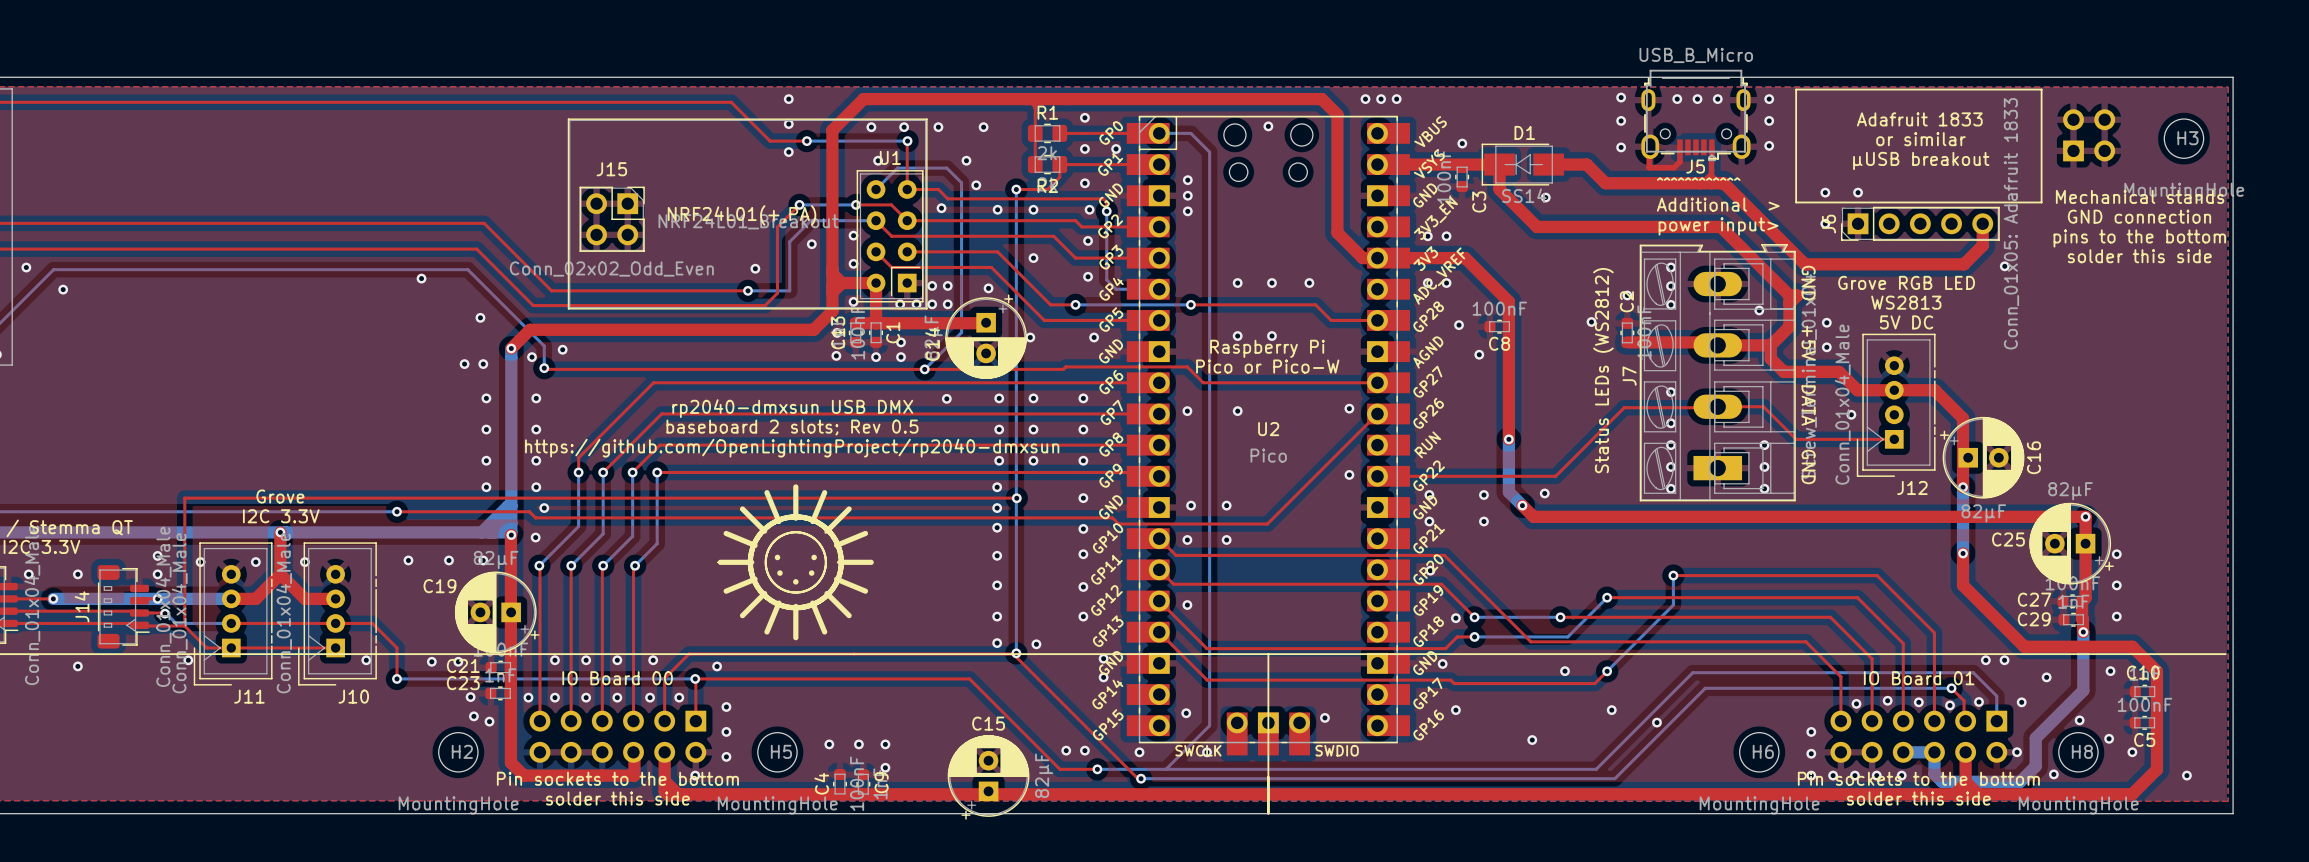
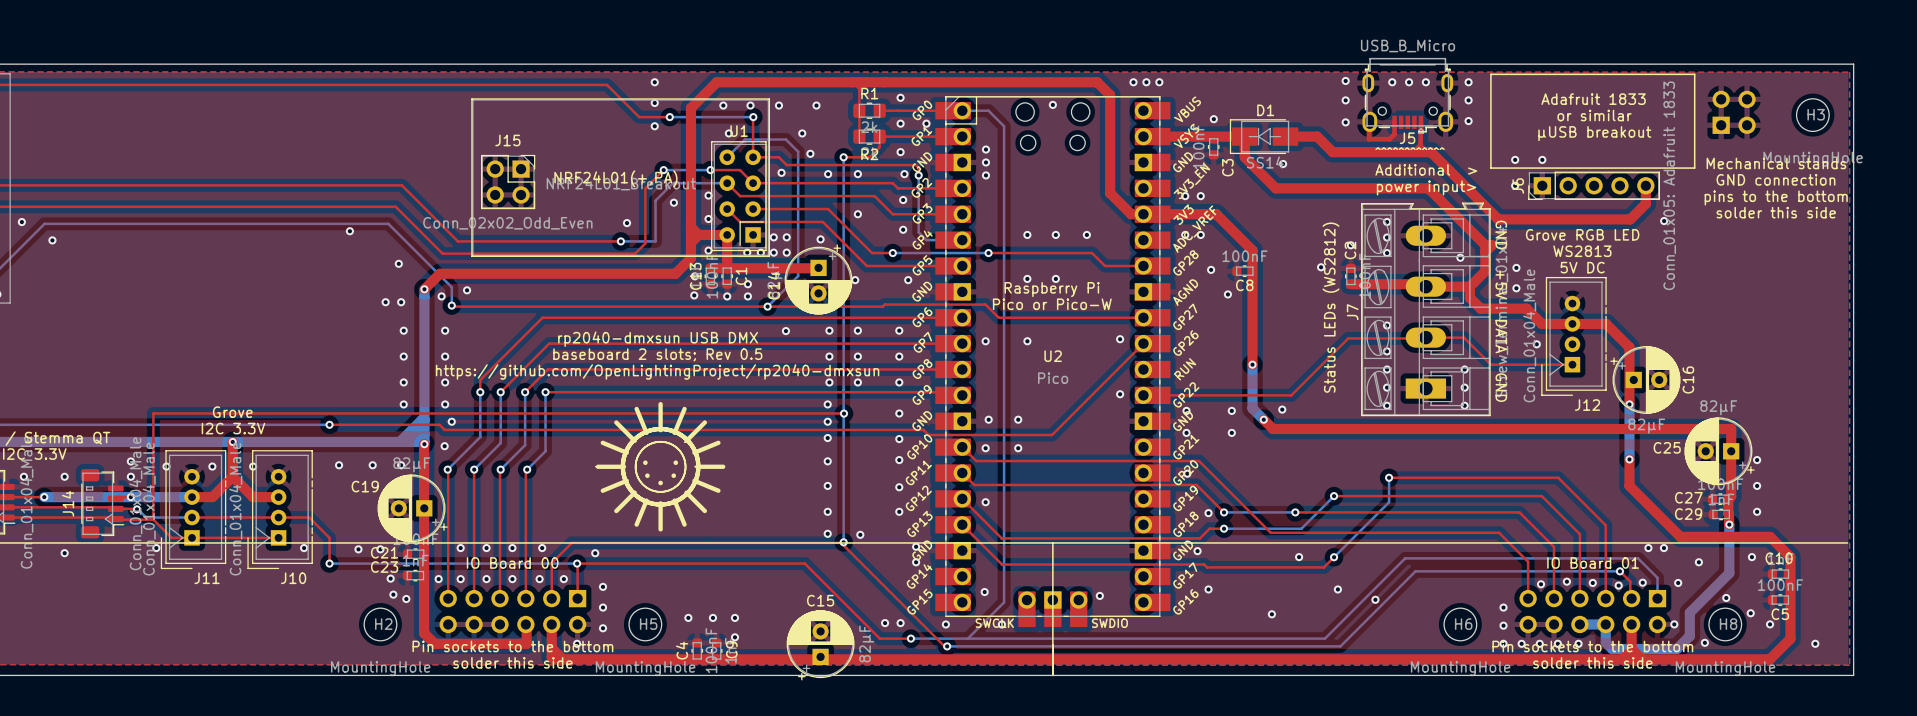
via: (2085, 516) -> none

